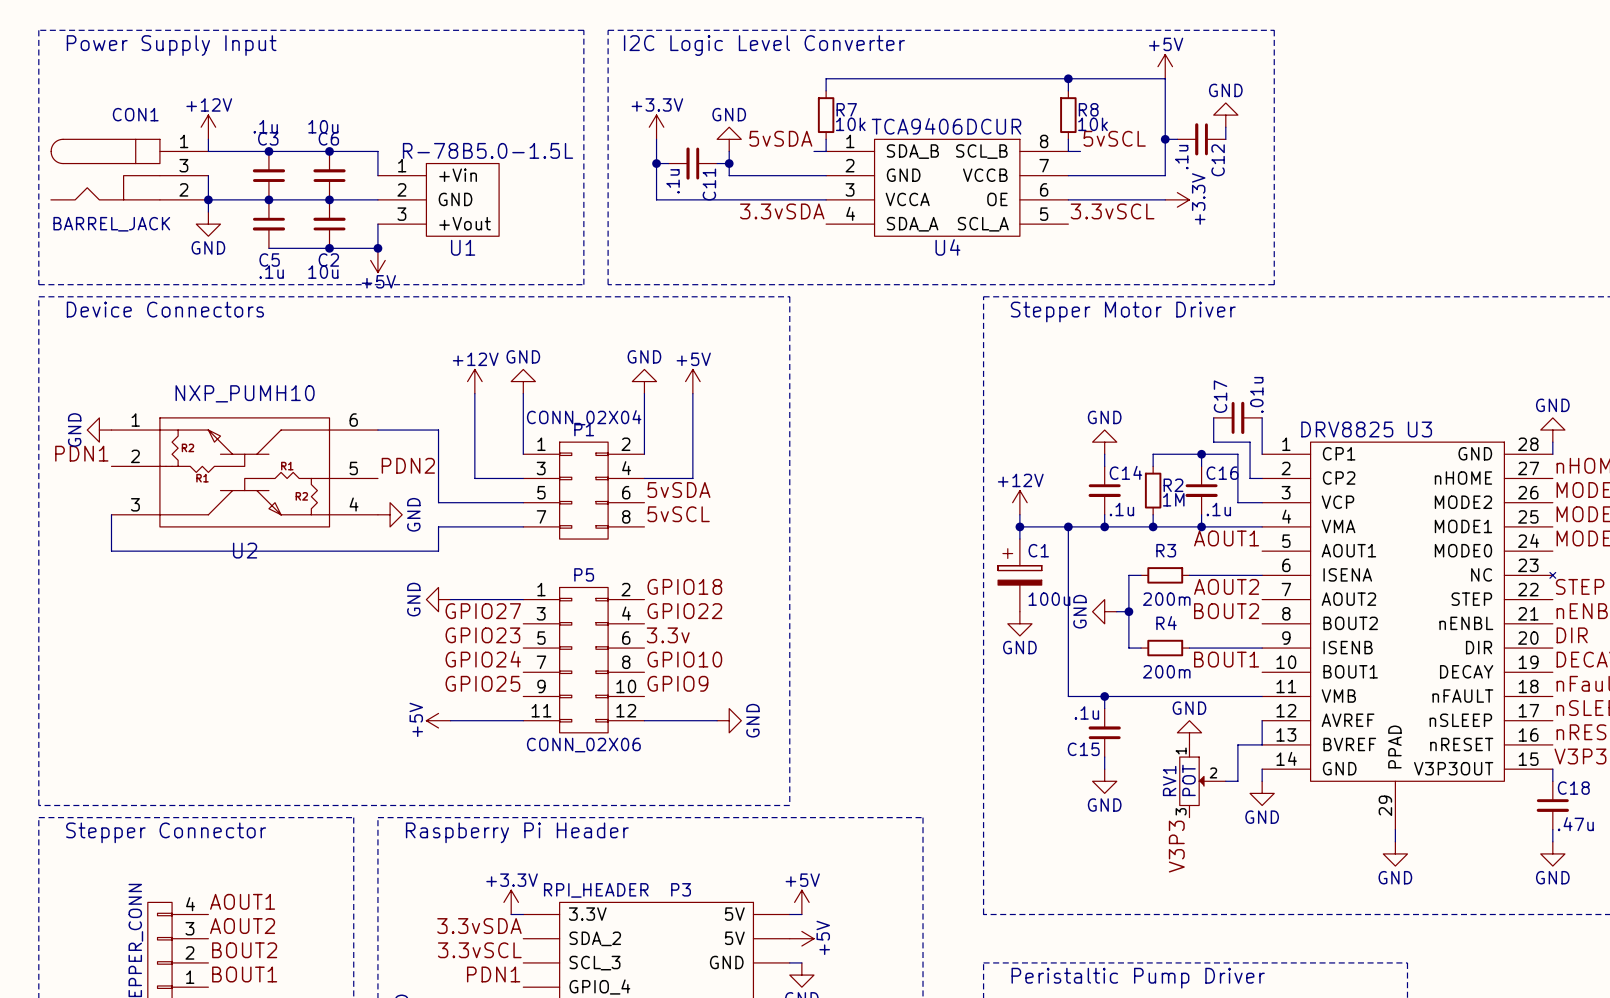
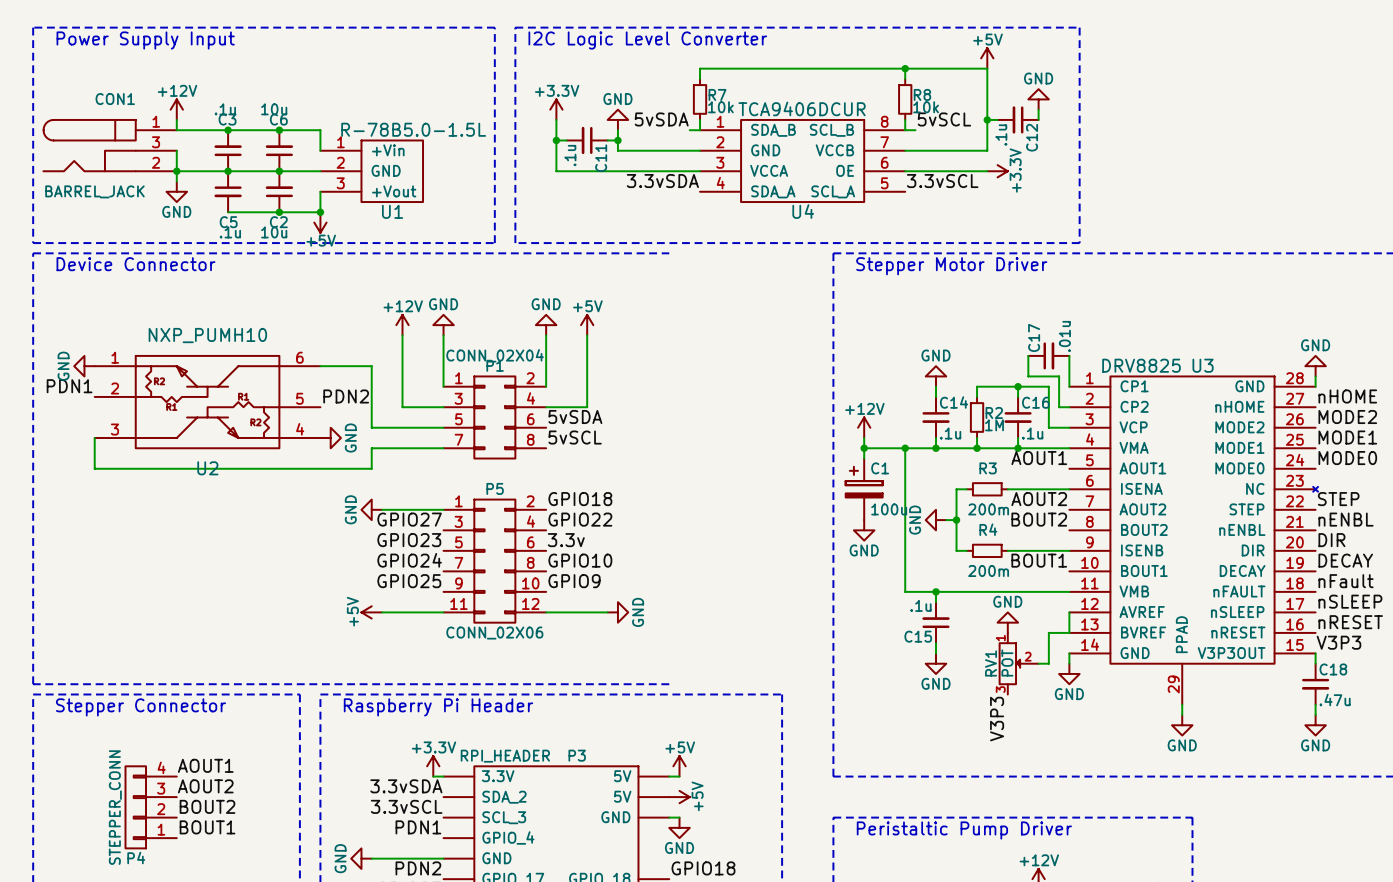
line: (789, 296) (789, 805) -> none
text: Device Connectors (165, 309) -> Device Connector (135, 264)

